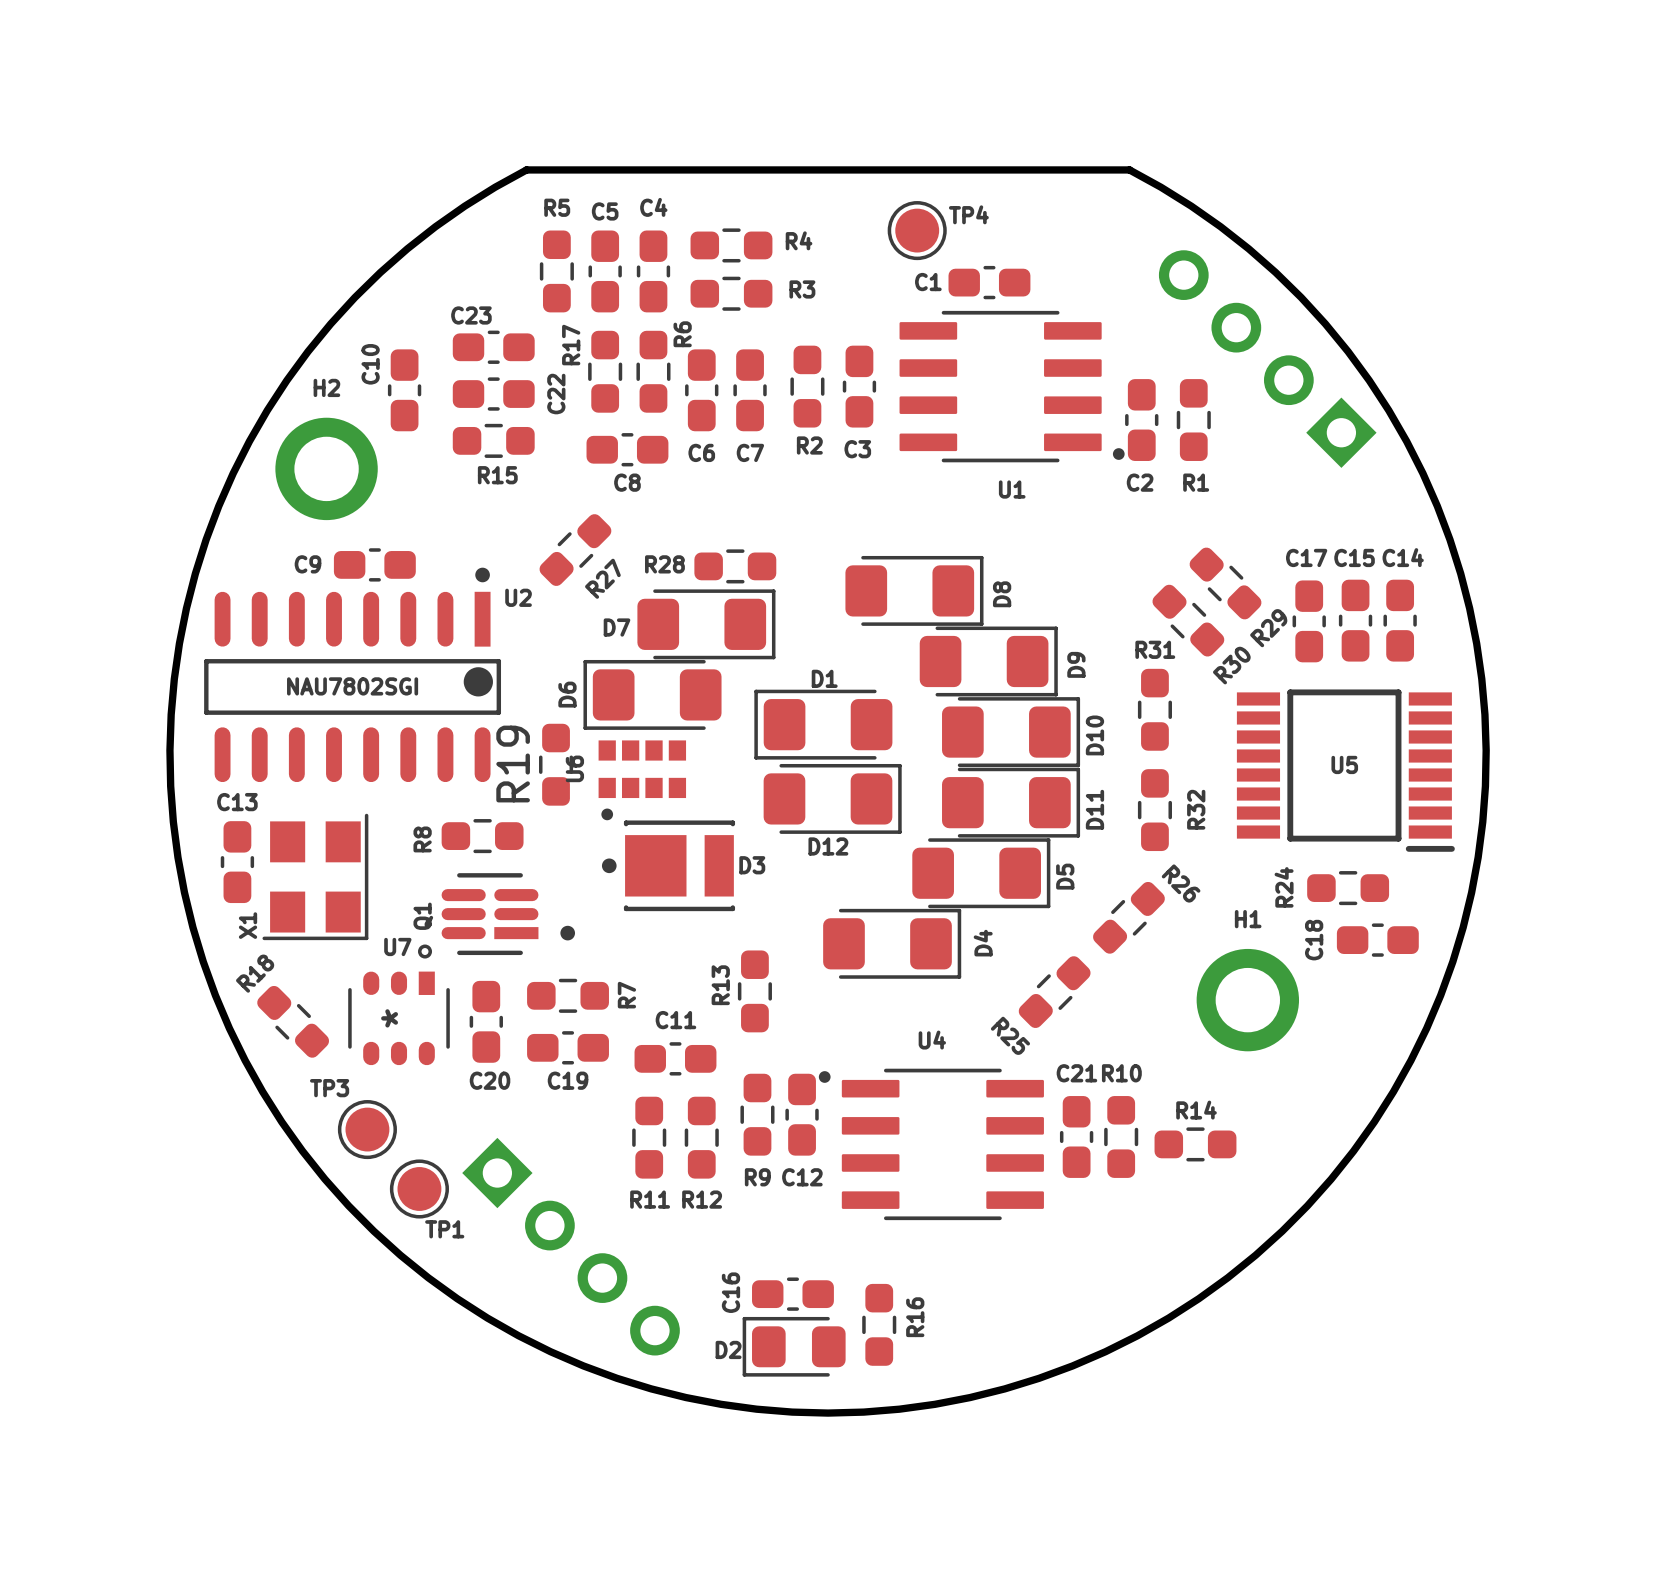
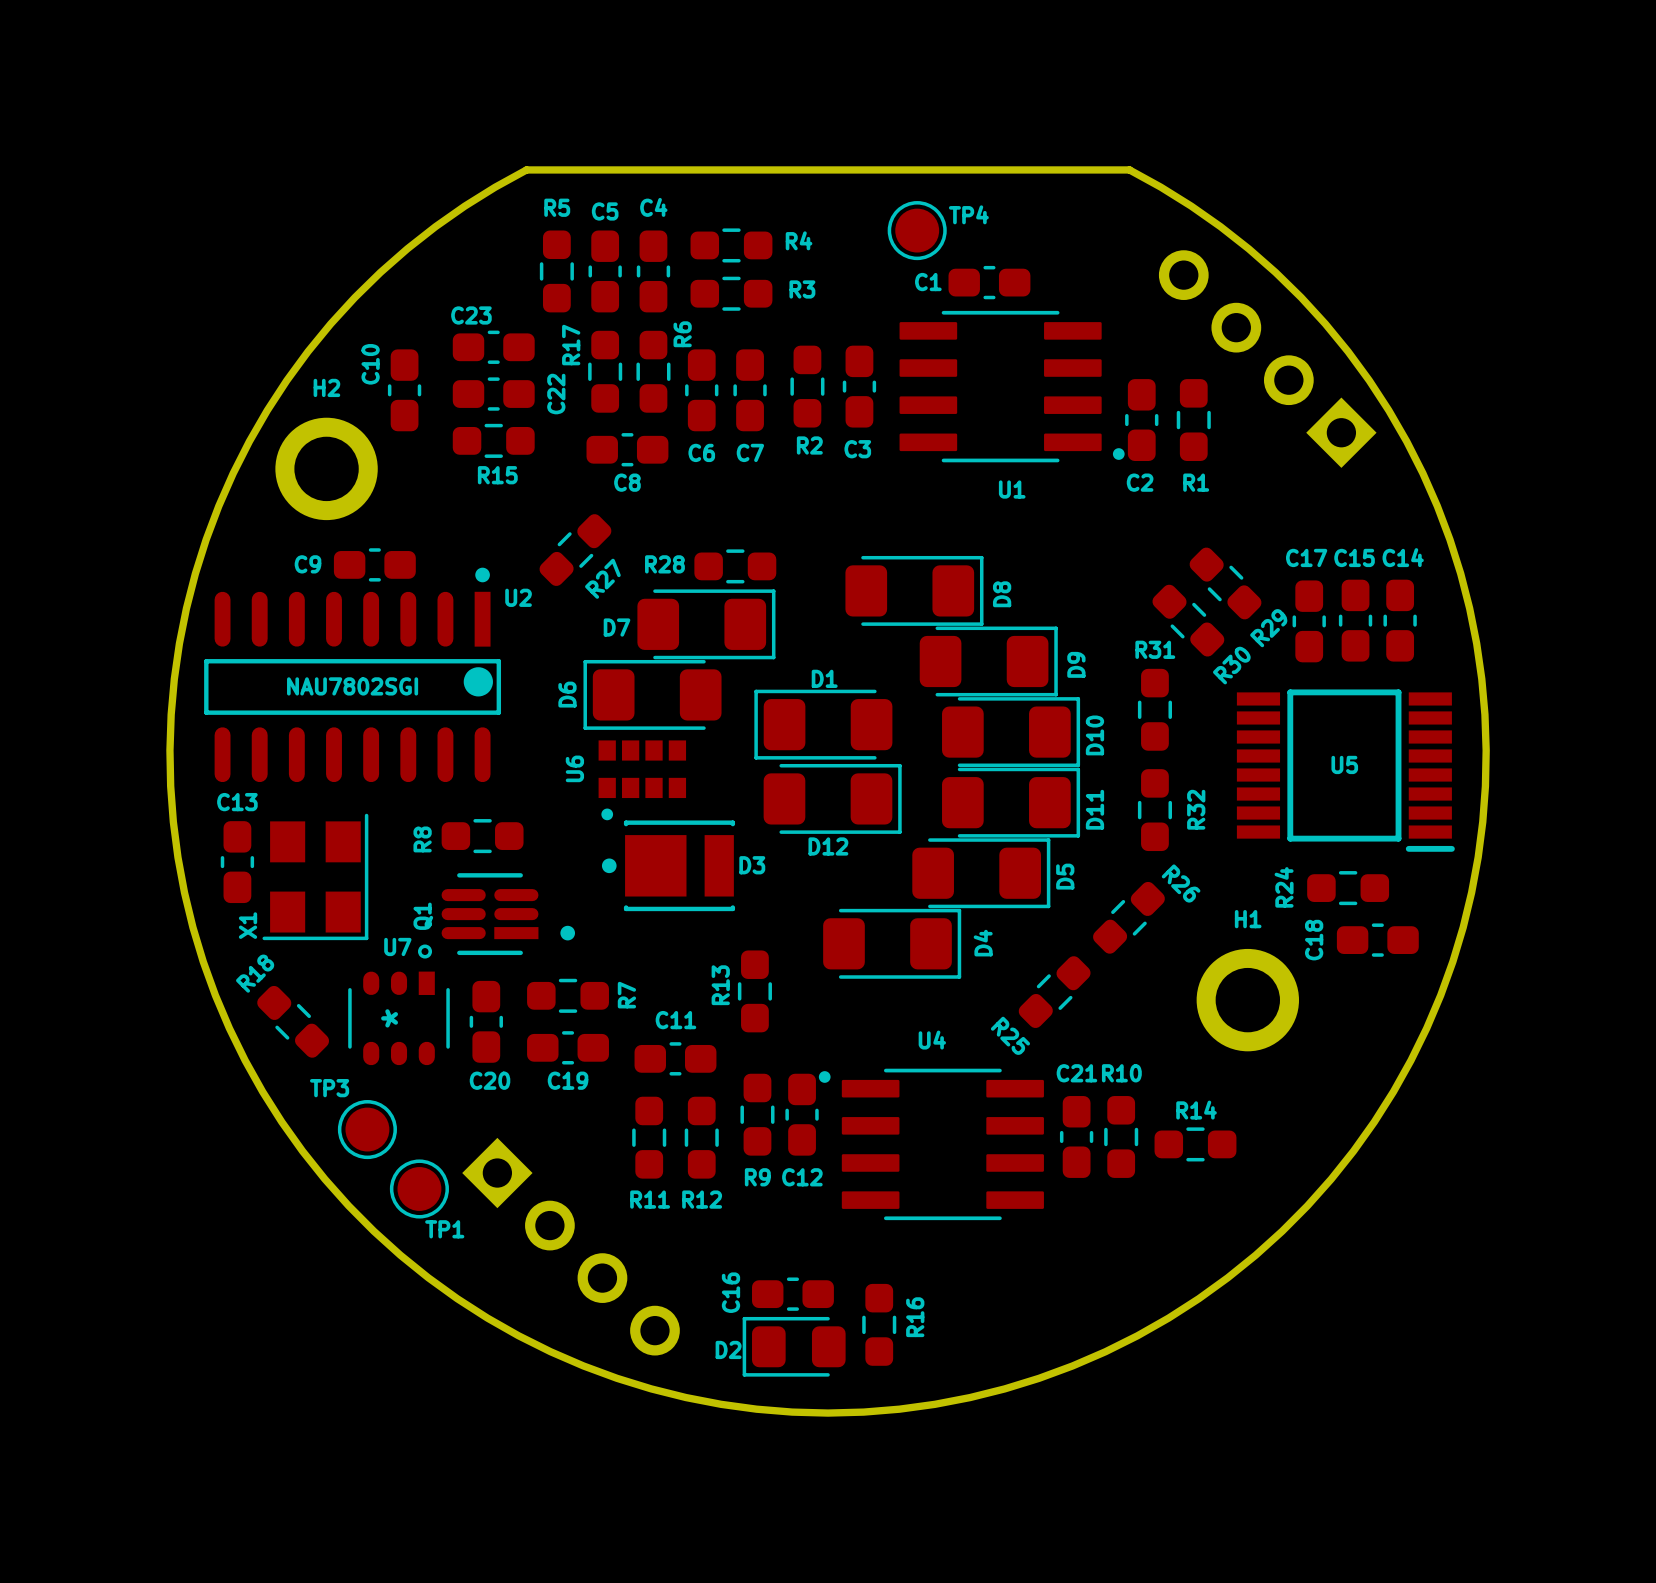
R19: (556, 764) -> none

